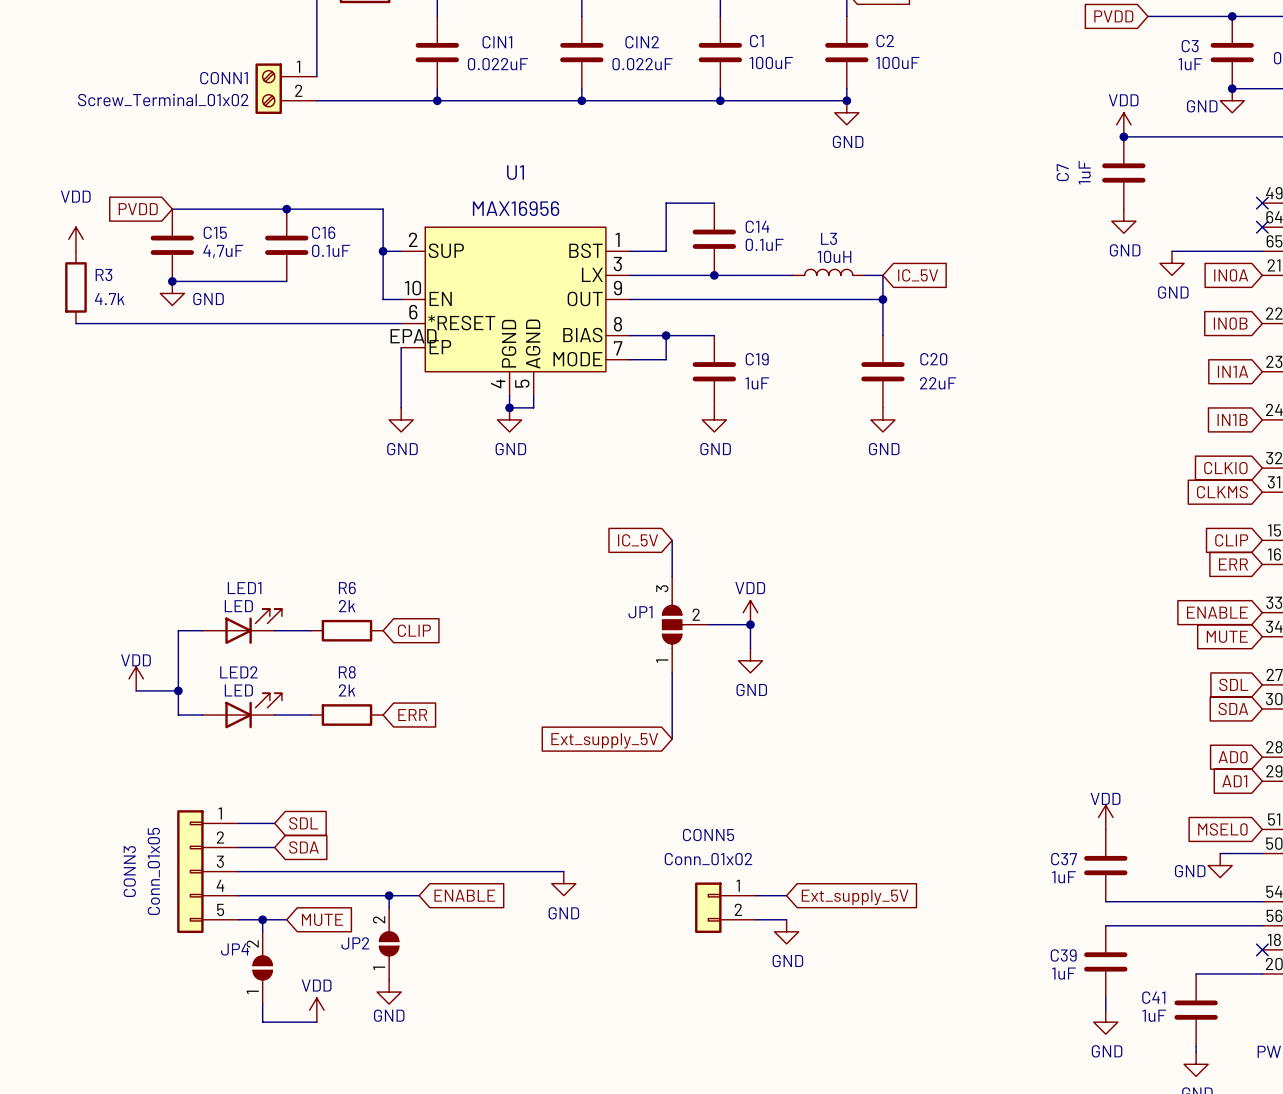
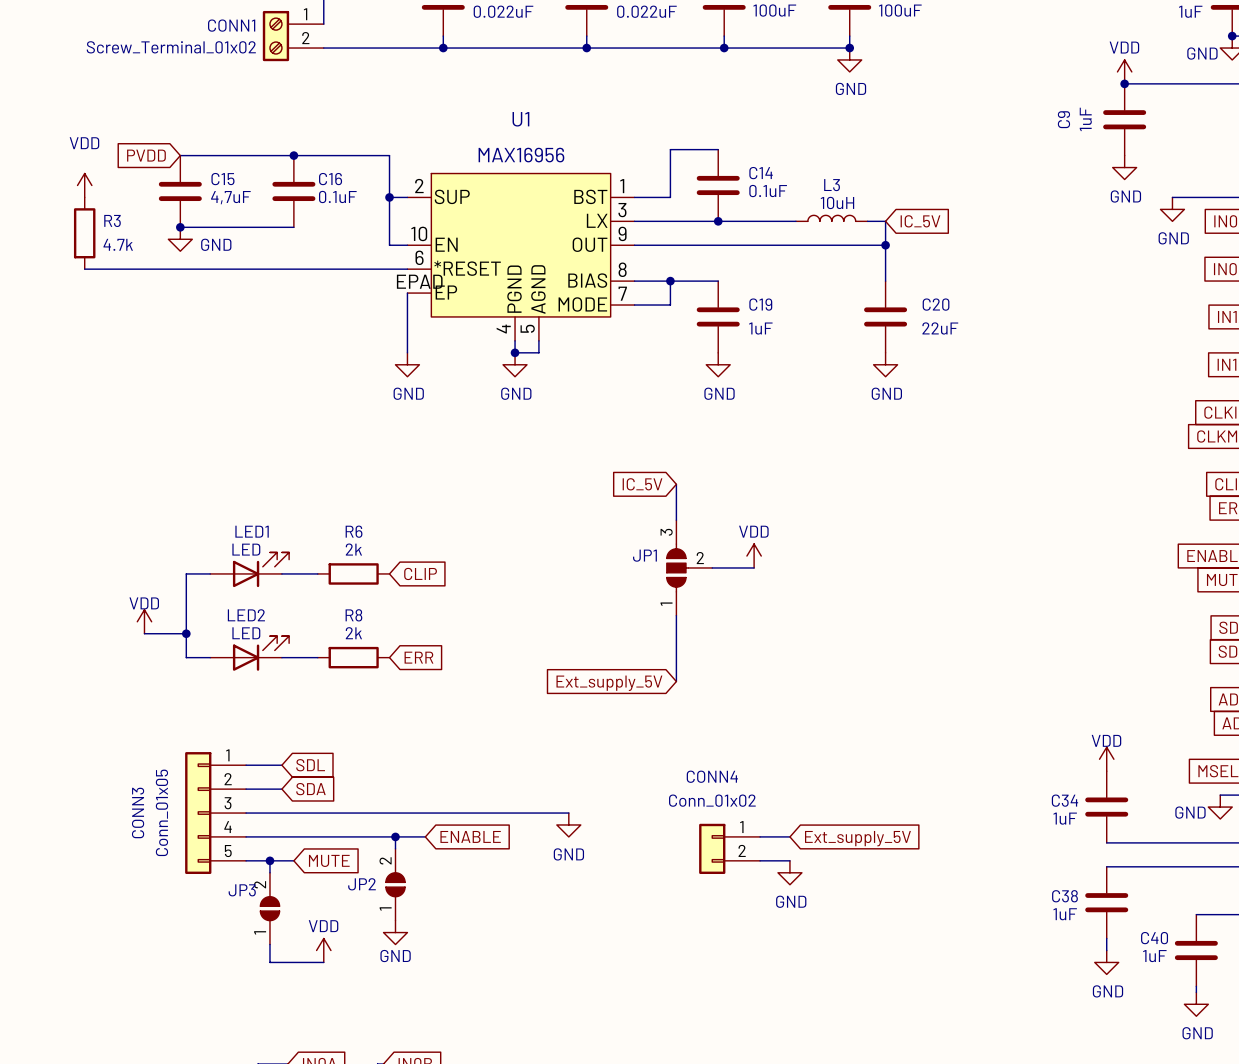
C7 name: C7 (1062, 172) -> C9 (1063, 119)
wire: (750, 624) (750, 648) -> none
junction: (750, 624) -> none
power symbol: GND (750, 660) -> none
CONN5 name: CONN5 (708, 835) -> CONN4 (712, 776)
C37 name: C37 (1064, 859) -> C34 (1064, 800)
JP4 name: JP4 (235, 949) -> JP3 (242, 890)
C39 name: C39 (1063, 955) -> C38 (1064, 896)
C41 name: C41 (1153, 997) -> C40 (1154, 938)

